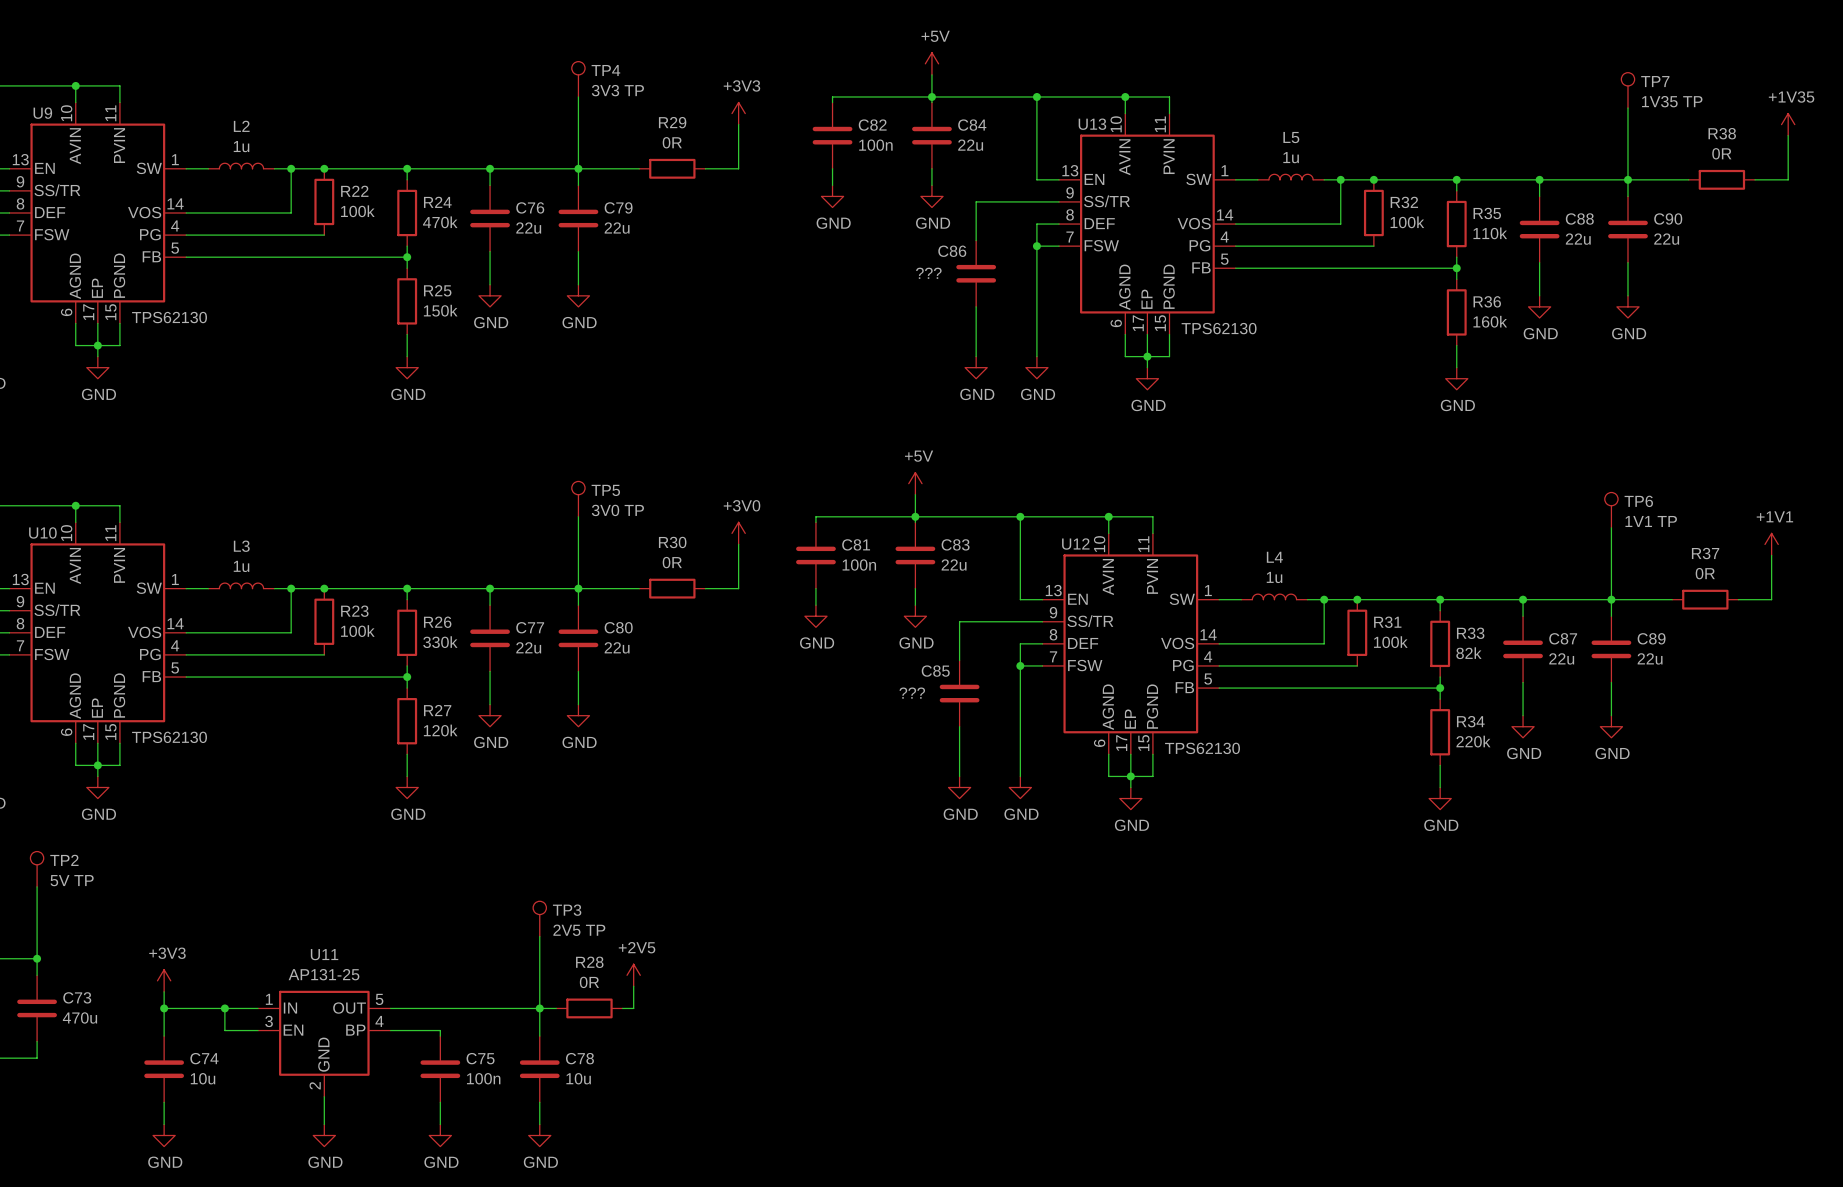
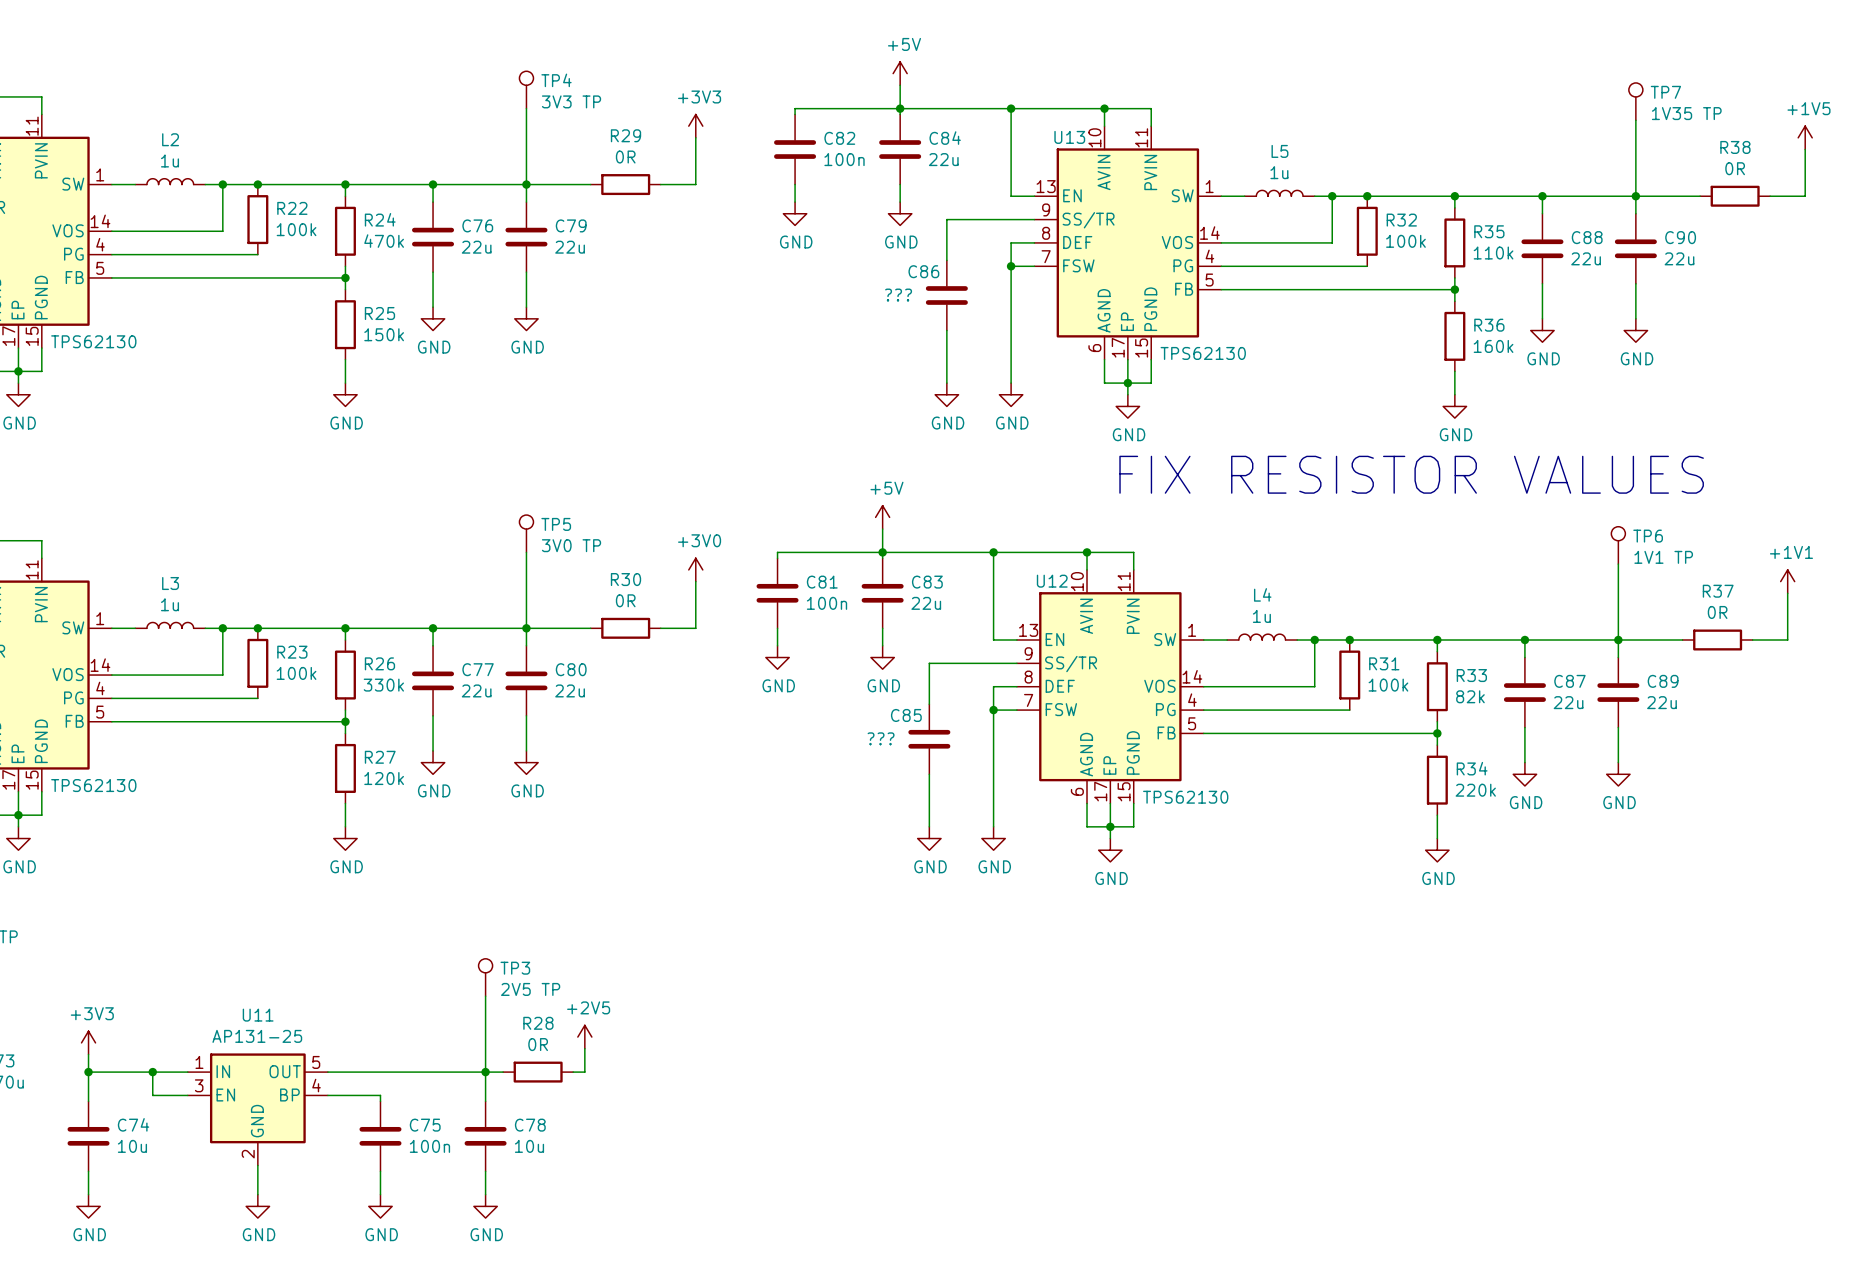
power symbol: +1V35 (1788, 124) -> +1V5 (1805, 137)
text: none -> FIX RESISTOR VALUES (1411, 474)

